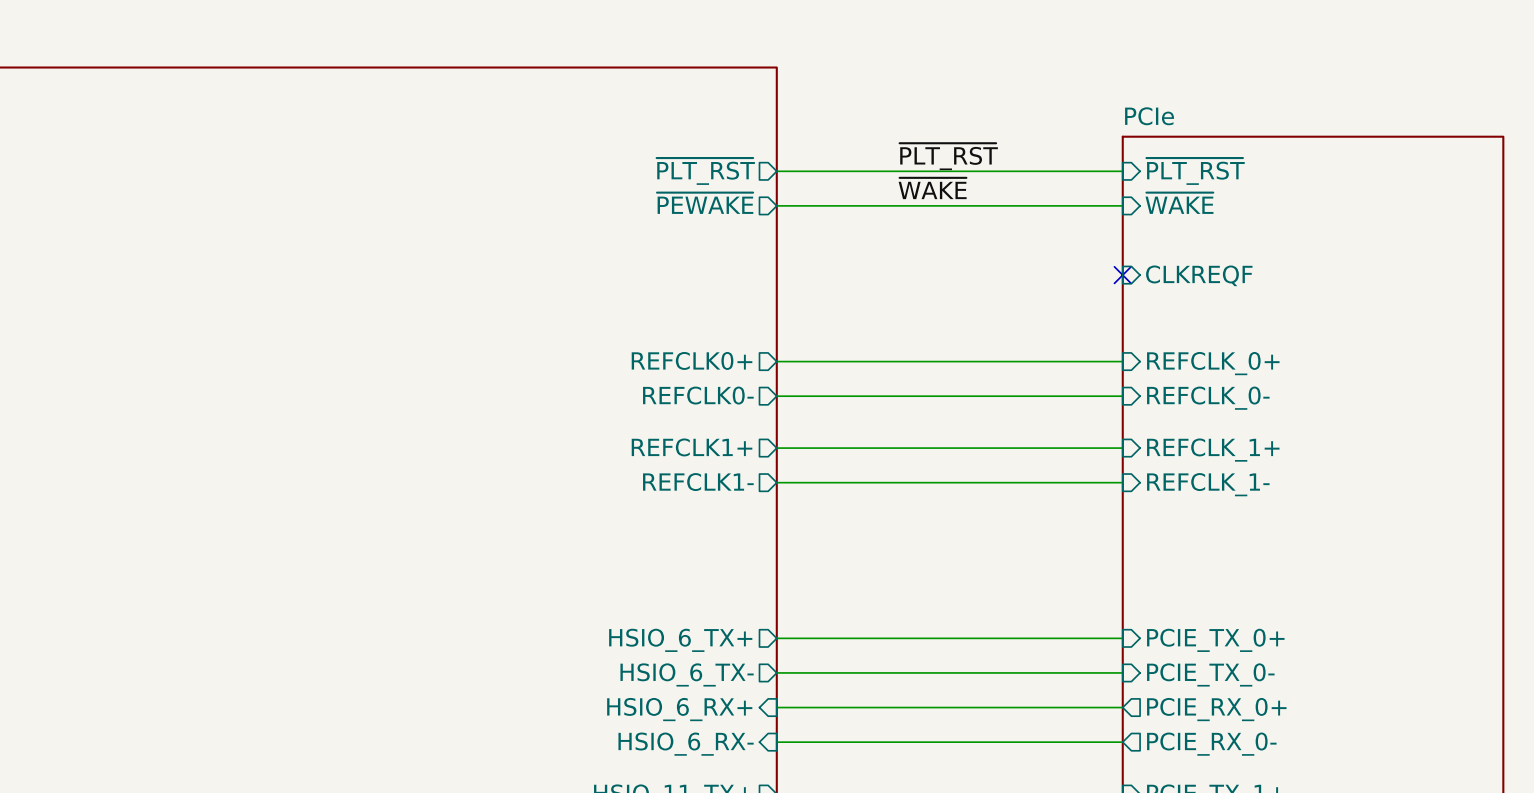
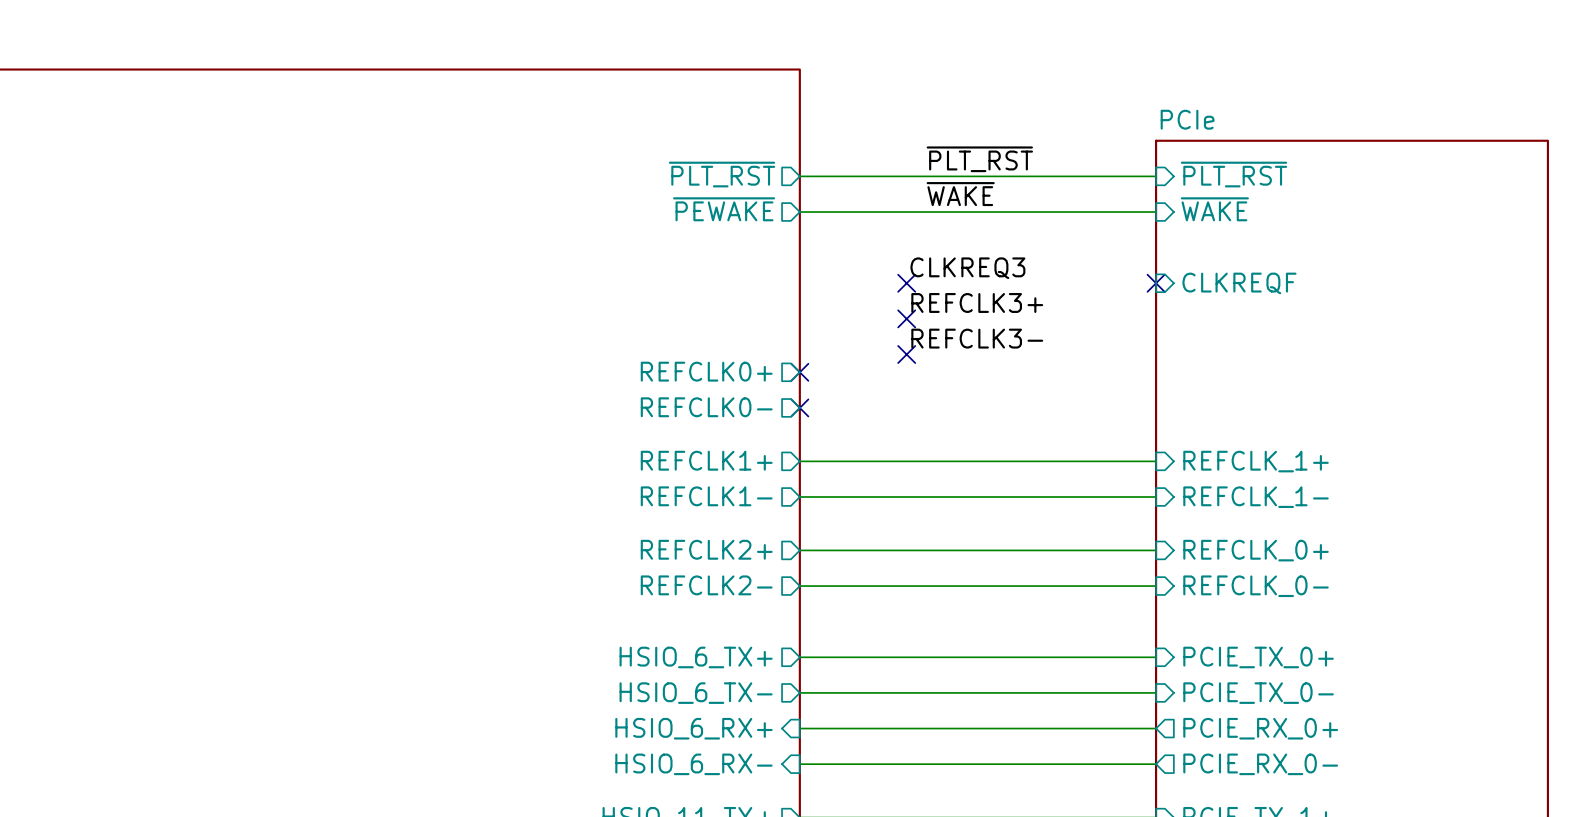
label: none -> CLKREQ3 (967, 268)
no-connect mark: none -> (906, 283)
label: none -> REFCLK3+ (977, 302)
no-connect mark: none -> (906, 318)
label: none -> REFCLK3- (977, 338)
no-connect mark: none -> (906, 354)
wire: (776, 361) (1122, 361) -> (799, 550) (1156, 550)
no-connect mark: none -> (799, 372)
sheet pin position: REFCLK_0+ (1213, 363) -> REFCLK_0+ (1256, 550)
wire: (776, 396) (1122, 396) -> (799, 586) (1156, 586)
no-connect mark: none -> (799, 407)
sheet pin position: REFCLK_0- (1208, 398) -> REFCLK_0- (1256, 586)
sheet pin: none -> REFCLK2+ (706, 549)
sheet pin: none -> REFCLK2- (706, 585)

